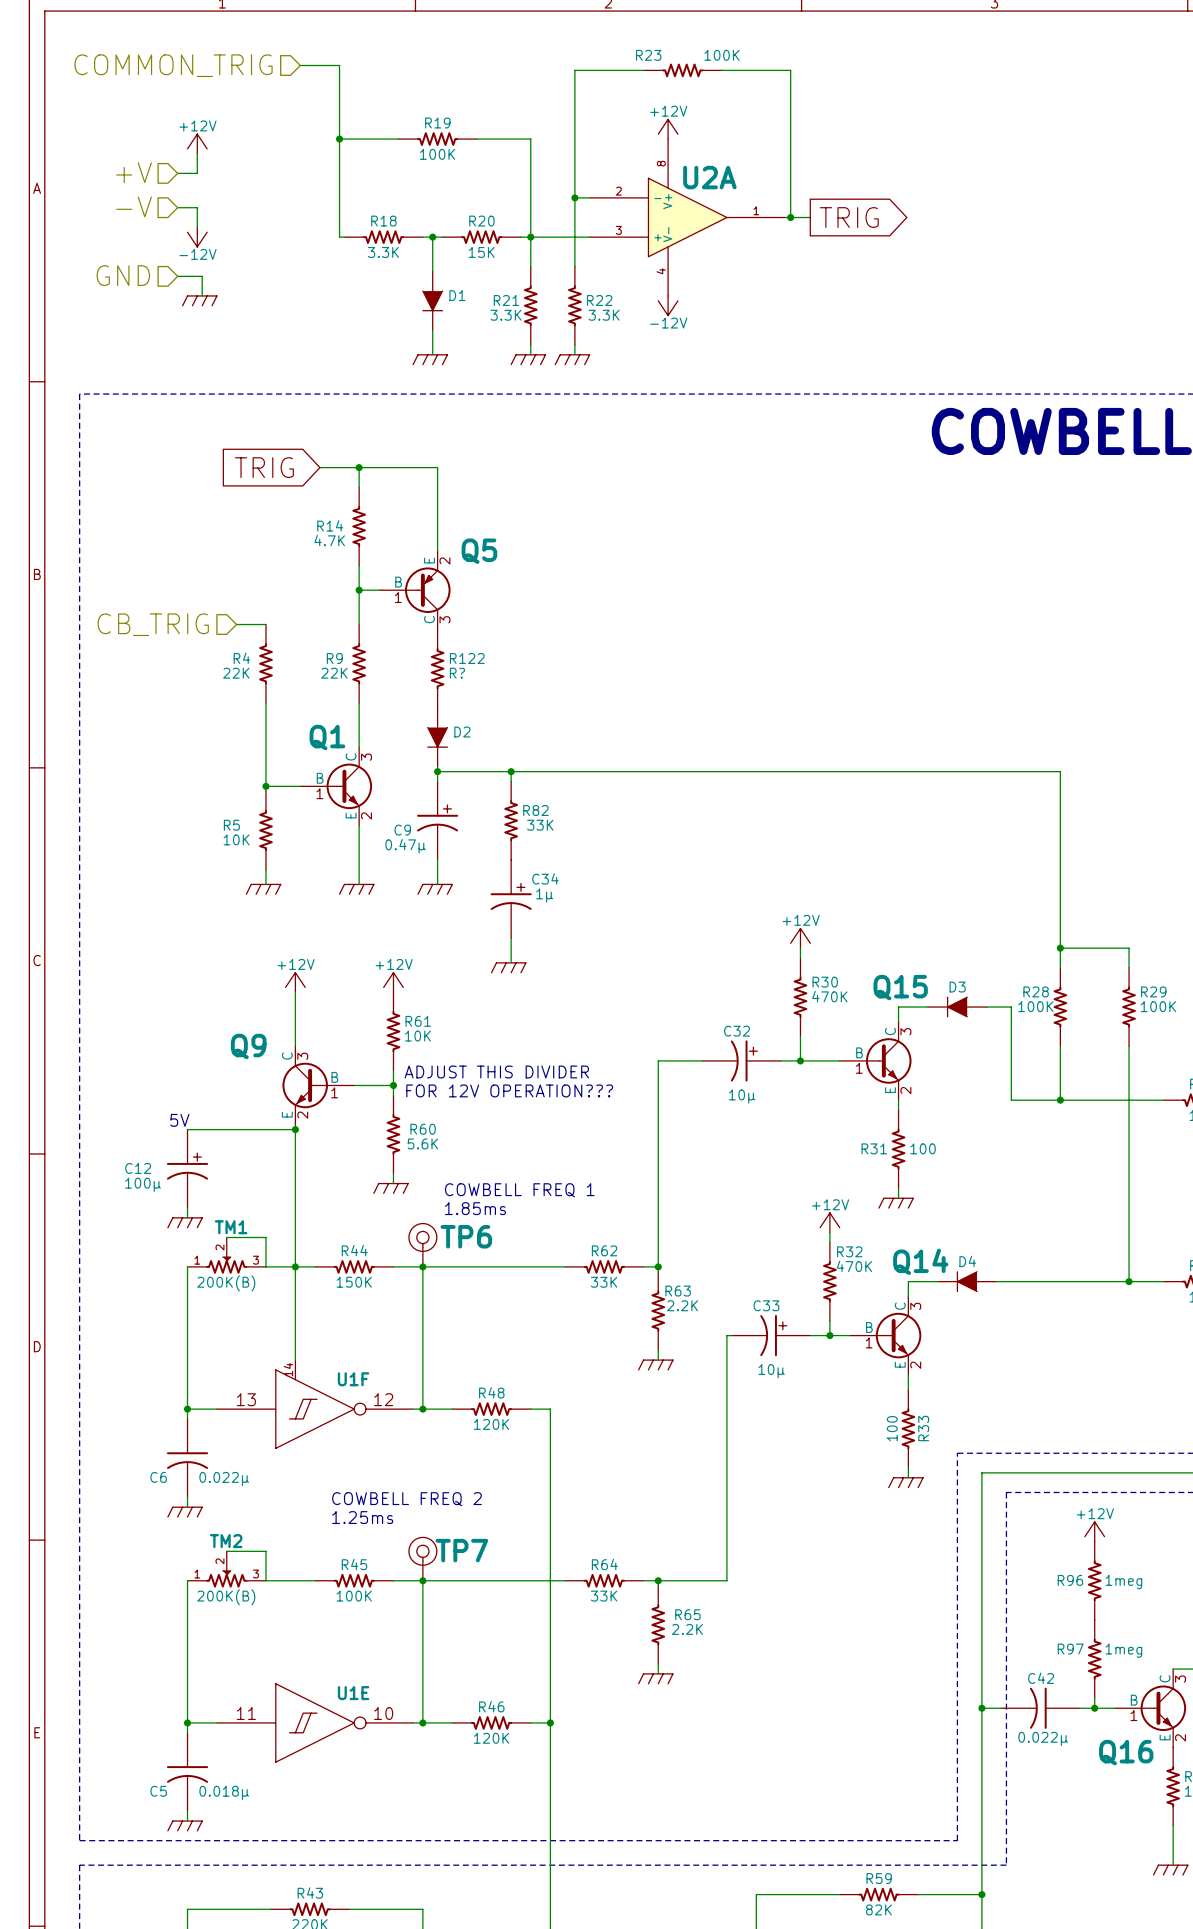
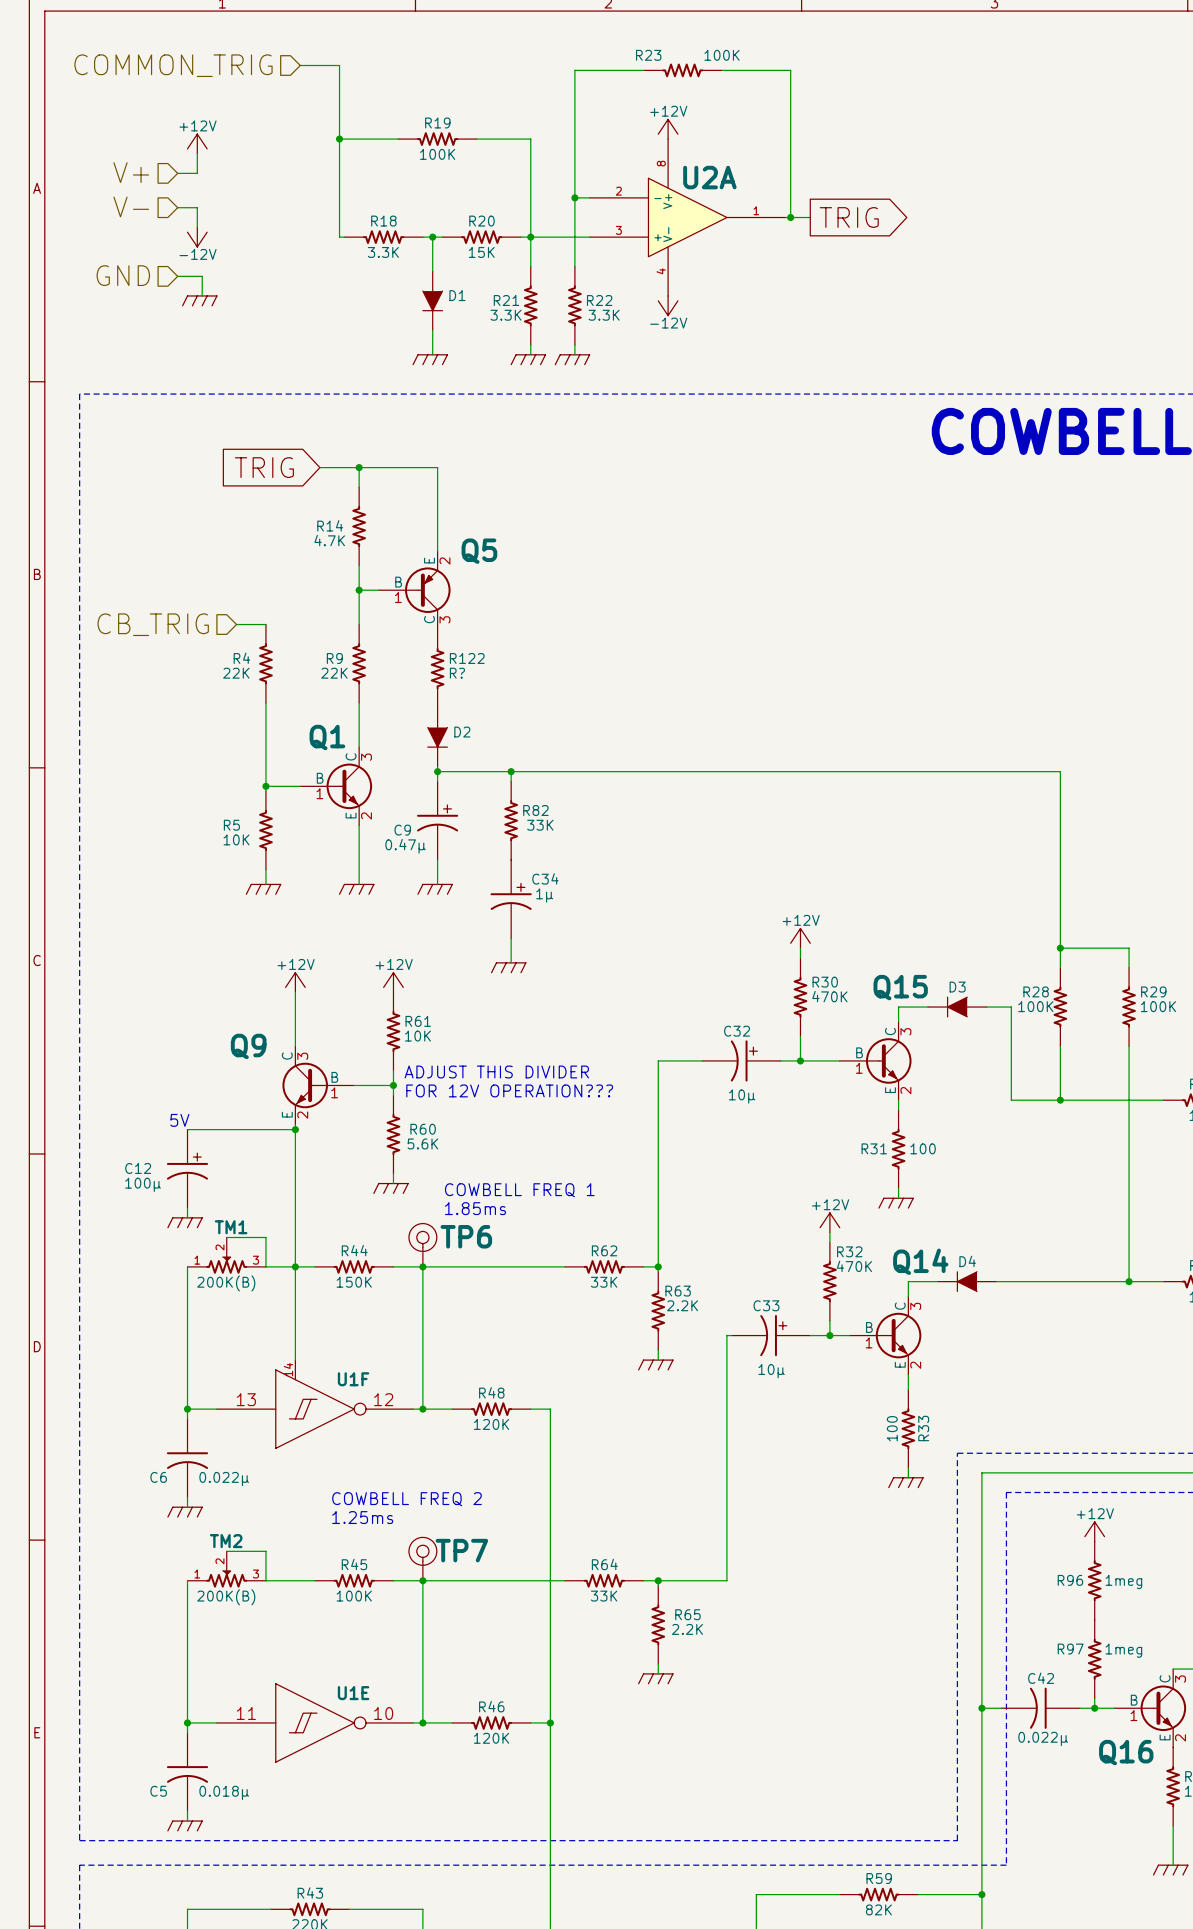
hierarchical label: +V (134, 172) -> V+ (131, 172)
hierarchical label: -V (134, 206) -> V- (131, 206)

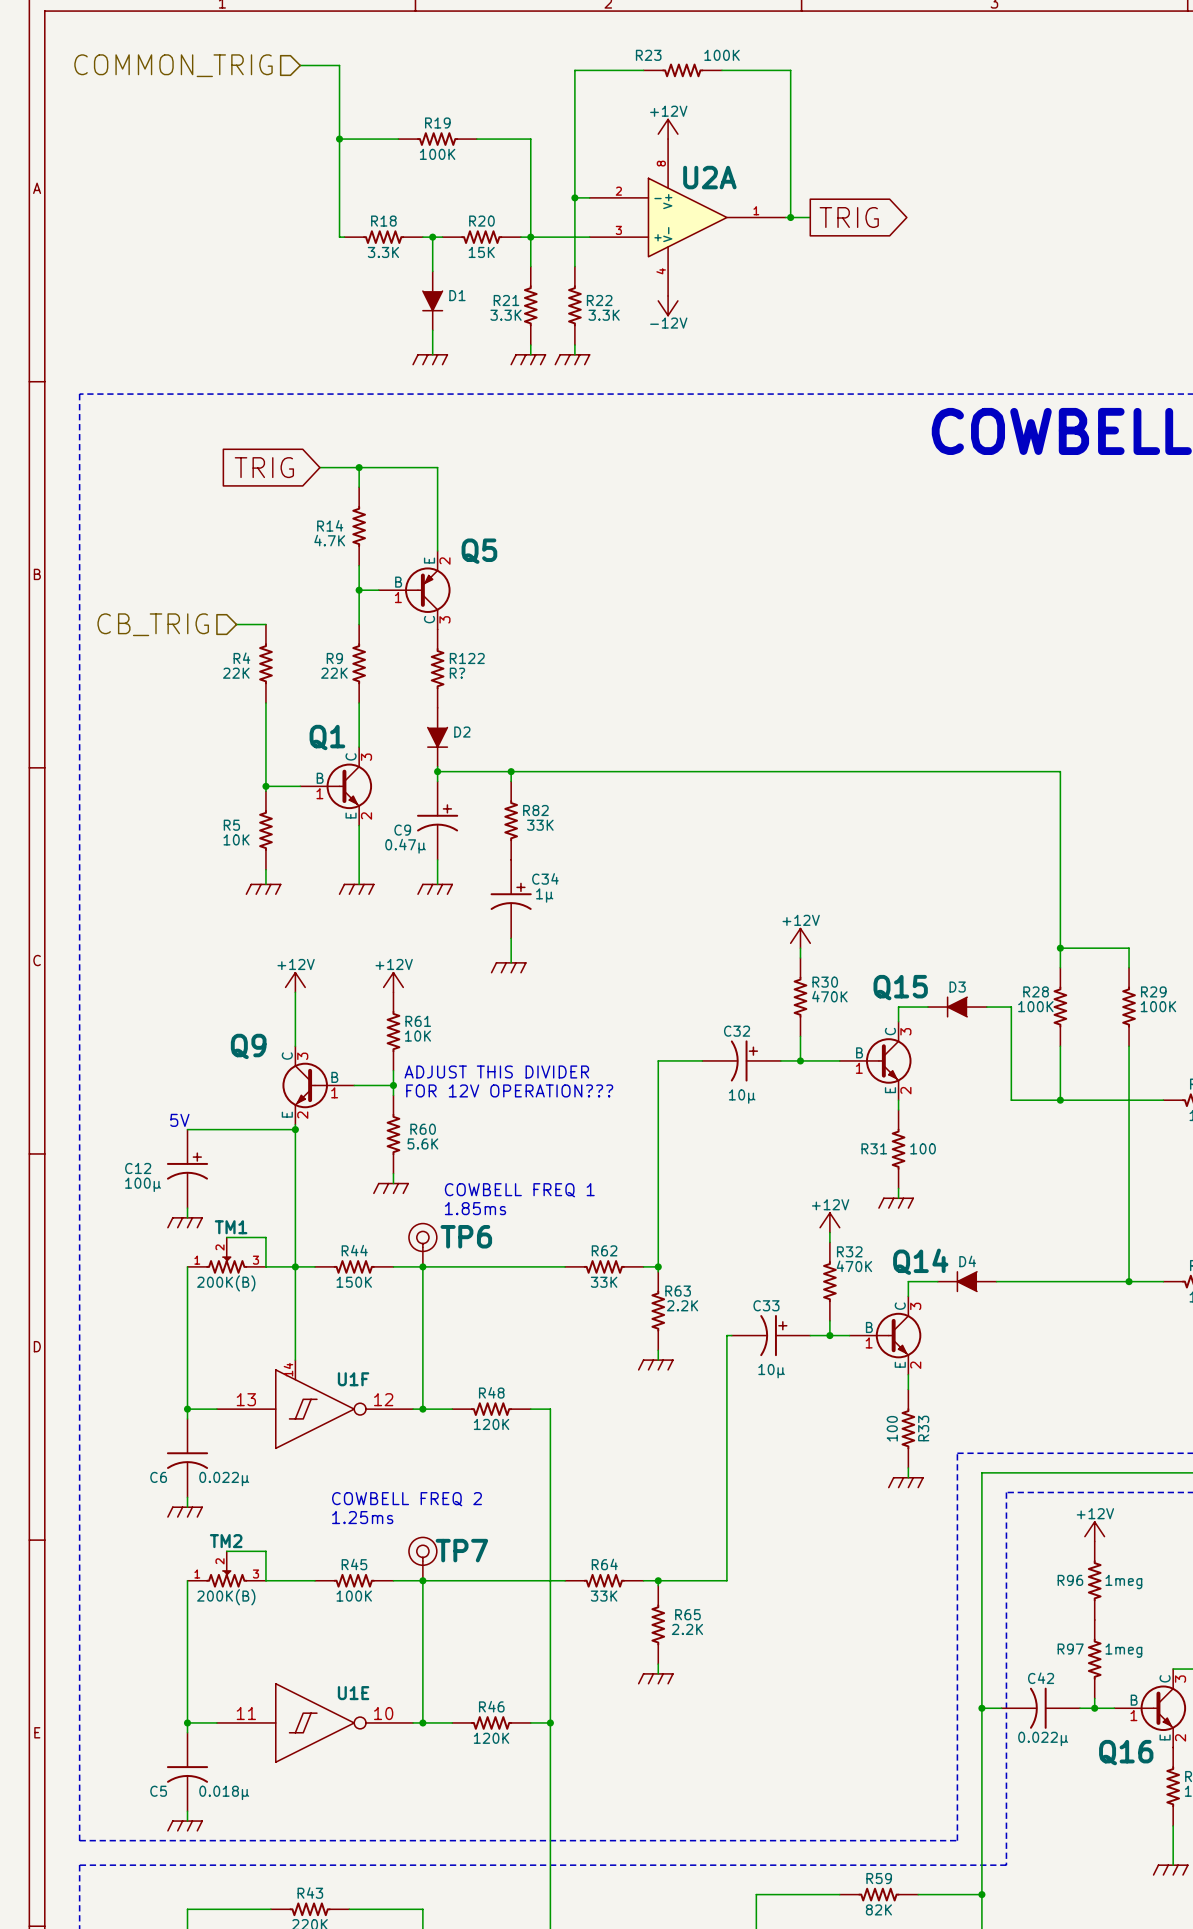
power symbol: +12V (197, 143) -> none
wire: (197, 153) (197, 173) (177, 173) -> none
hierarchical label: V+ (131, 172) -> none
hierarchical label: V- (131, 206) -> none
wire: (177, 207) (197, 207) (197, 227) -> none
power symbol: -12V (197, 237) -> none
hierarchical label: GND (123, 275) -> none
wire: (177, 276) (202, 276) (202, 295) -> none
power symbol: (199, 300) -> none

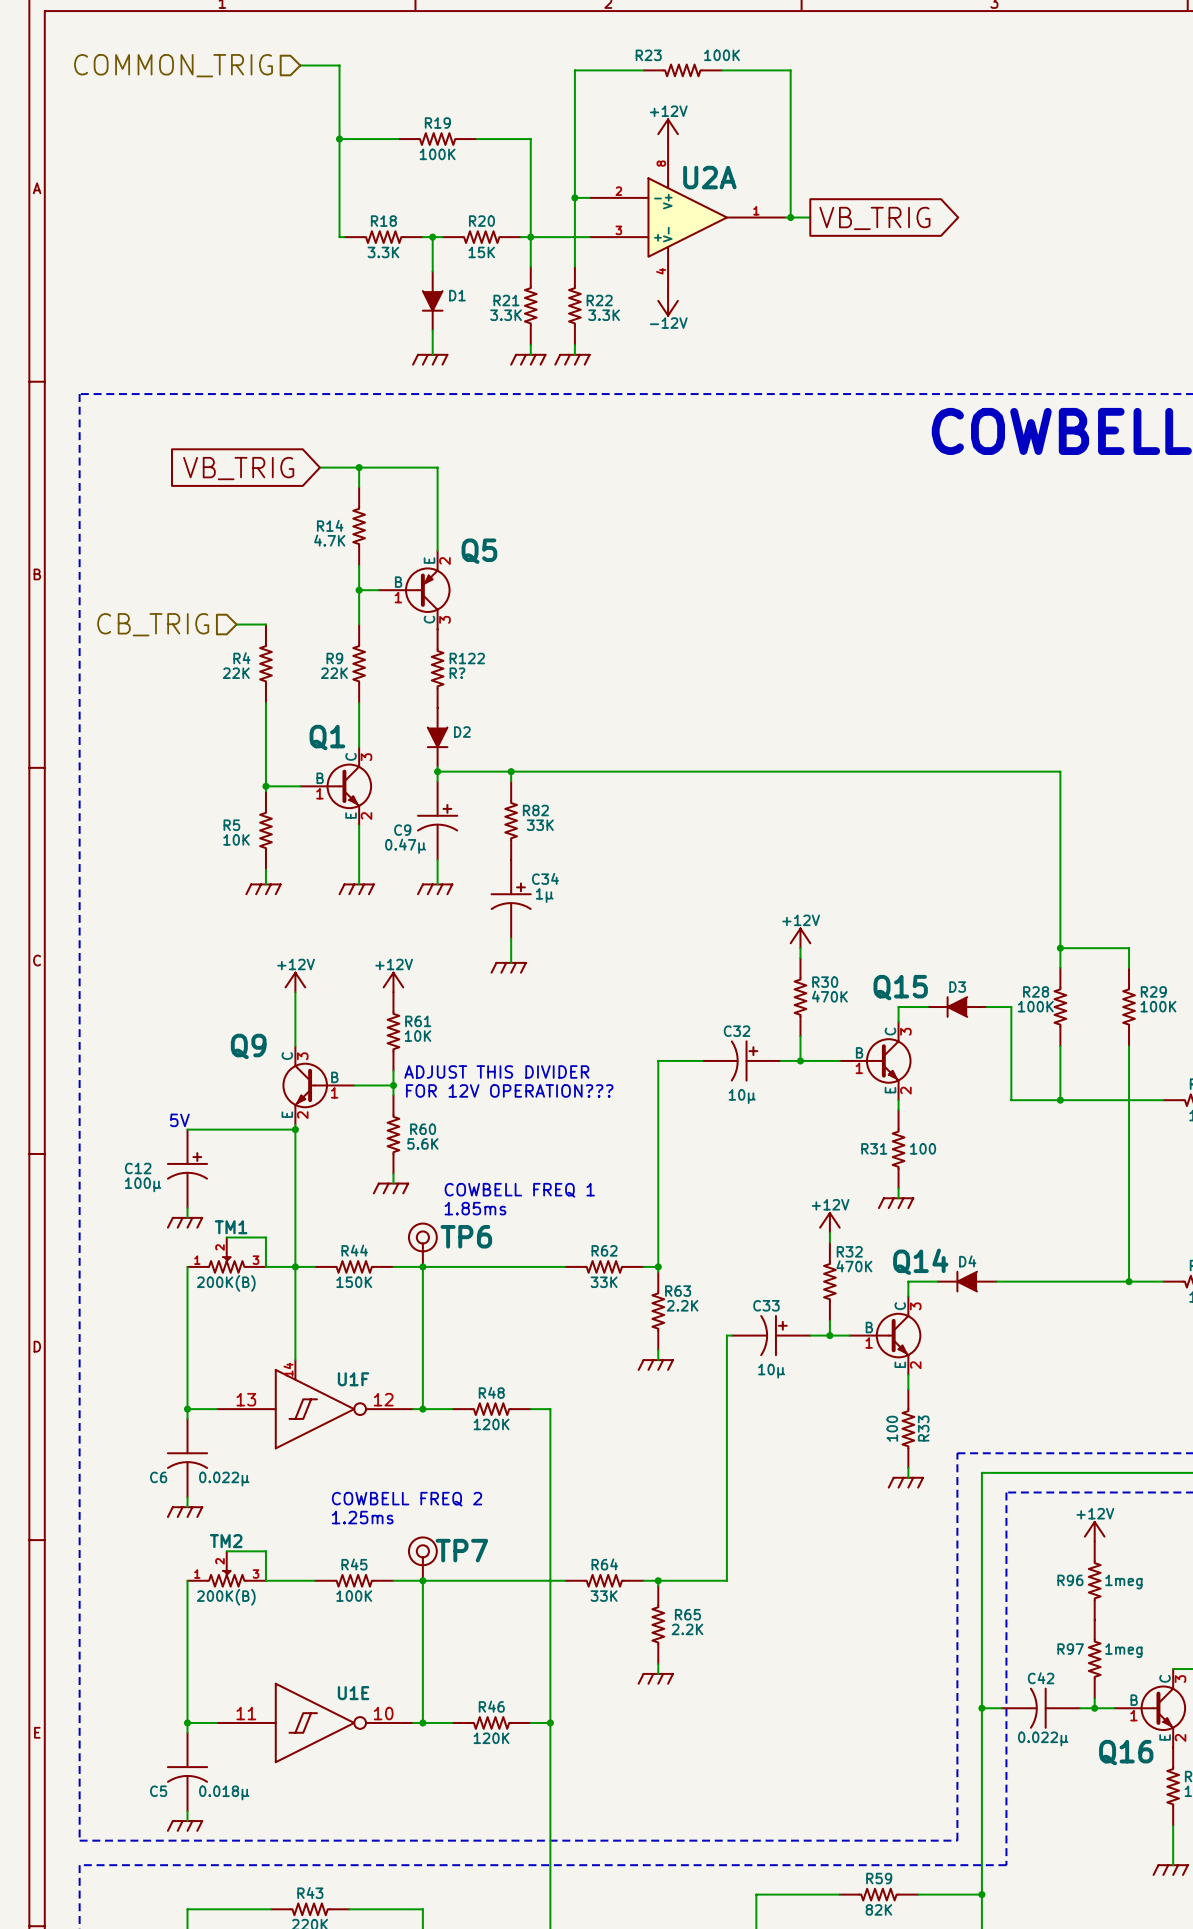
global label: TRIG (849, 217) -> VB_TRIG (874, 218)
global label: TRIG (264, 467) -> VB_TRIG (238, 468)

